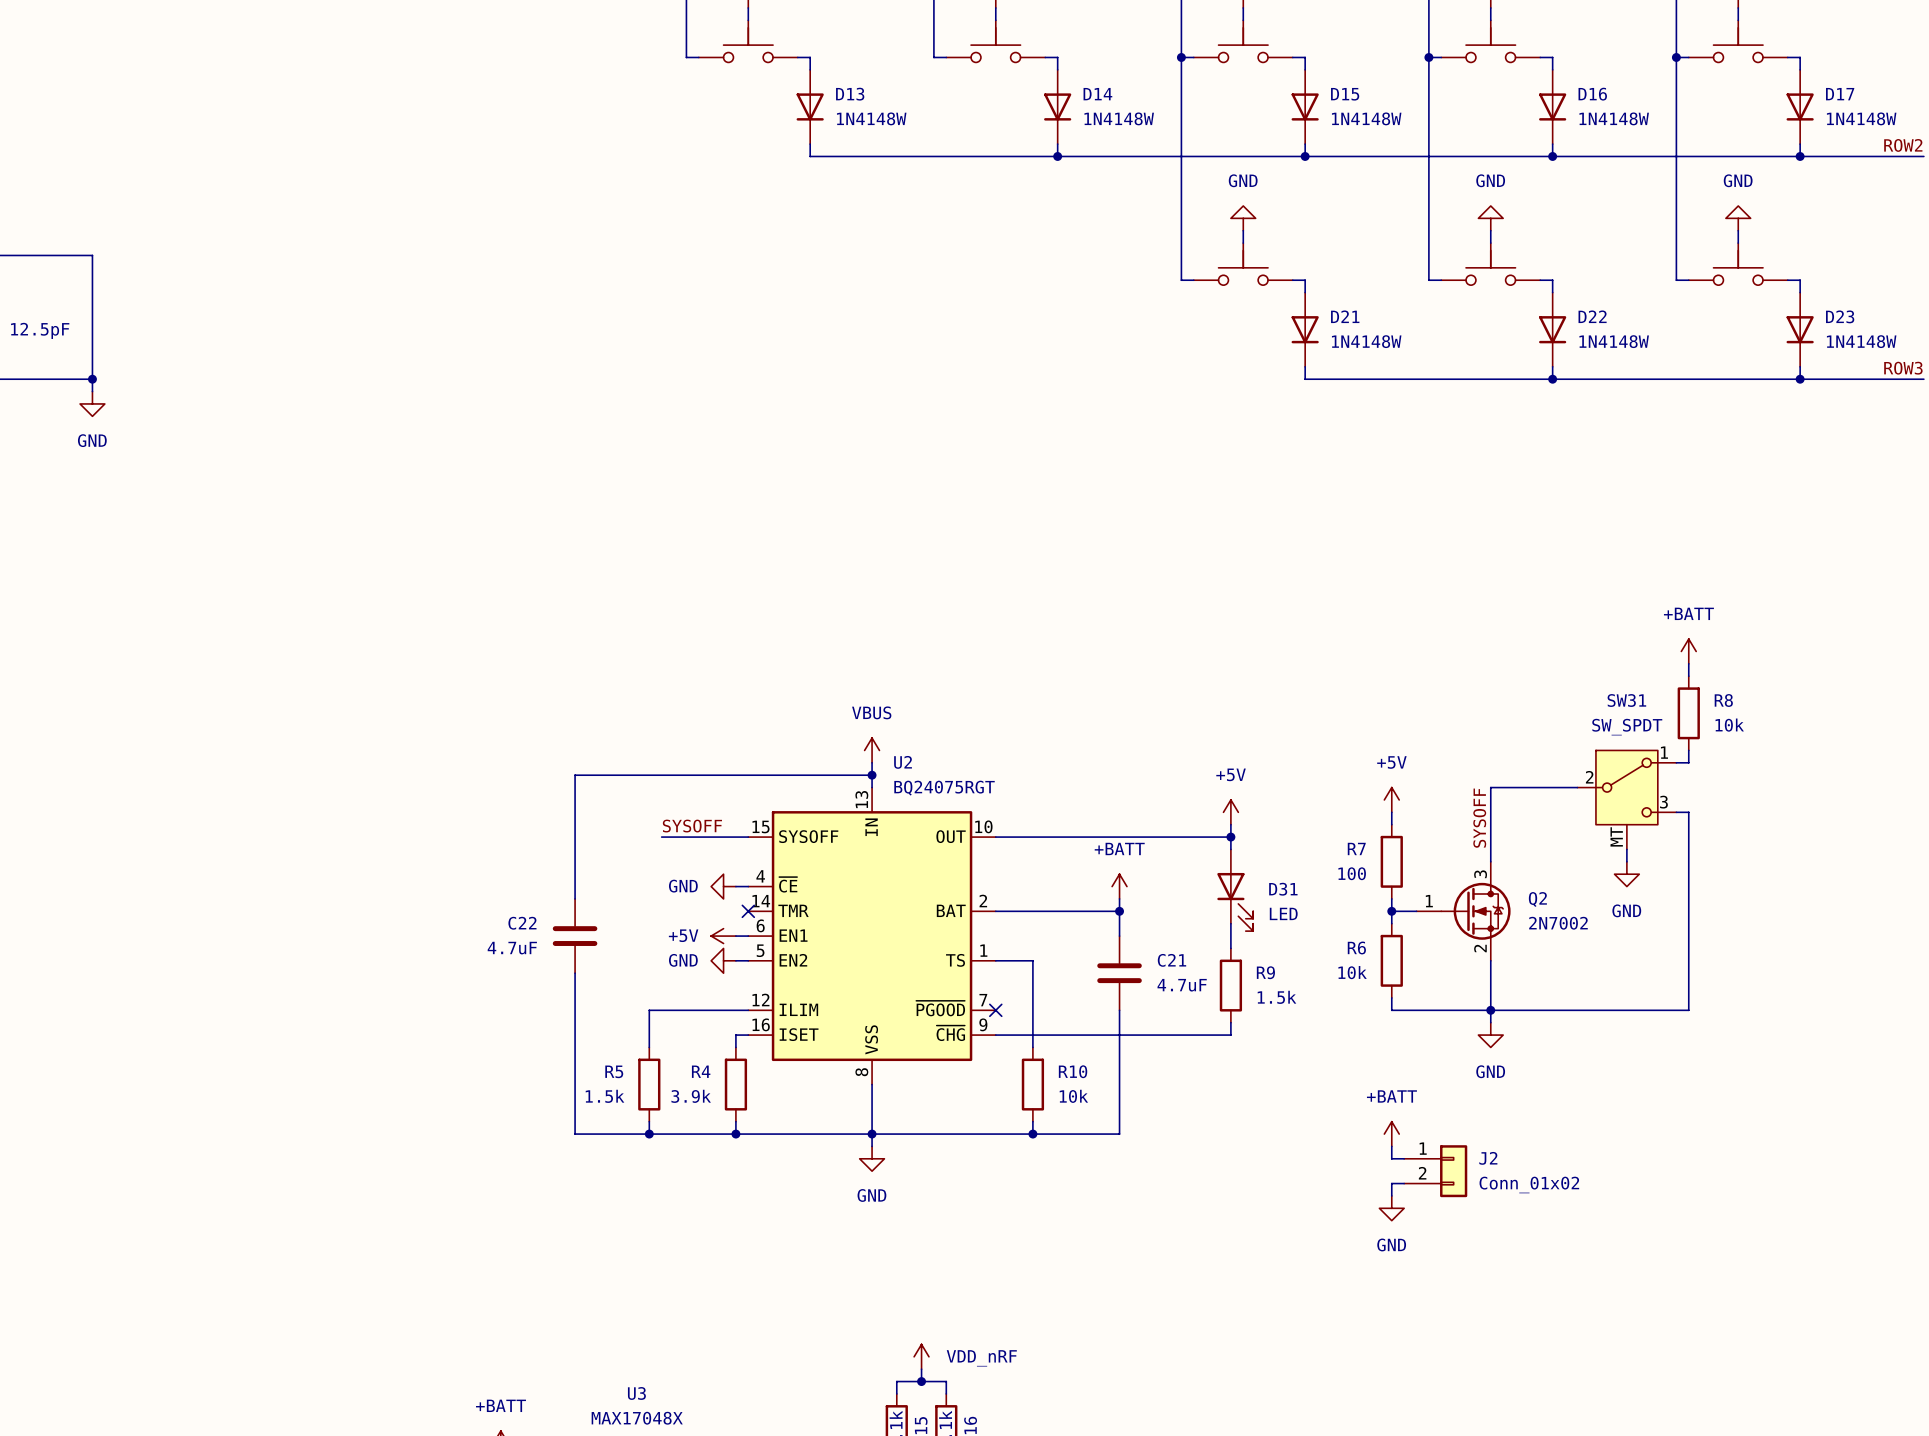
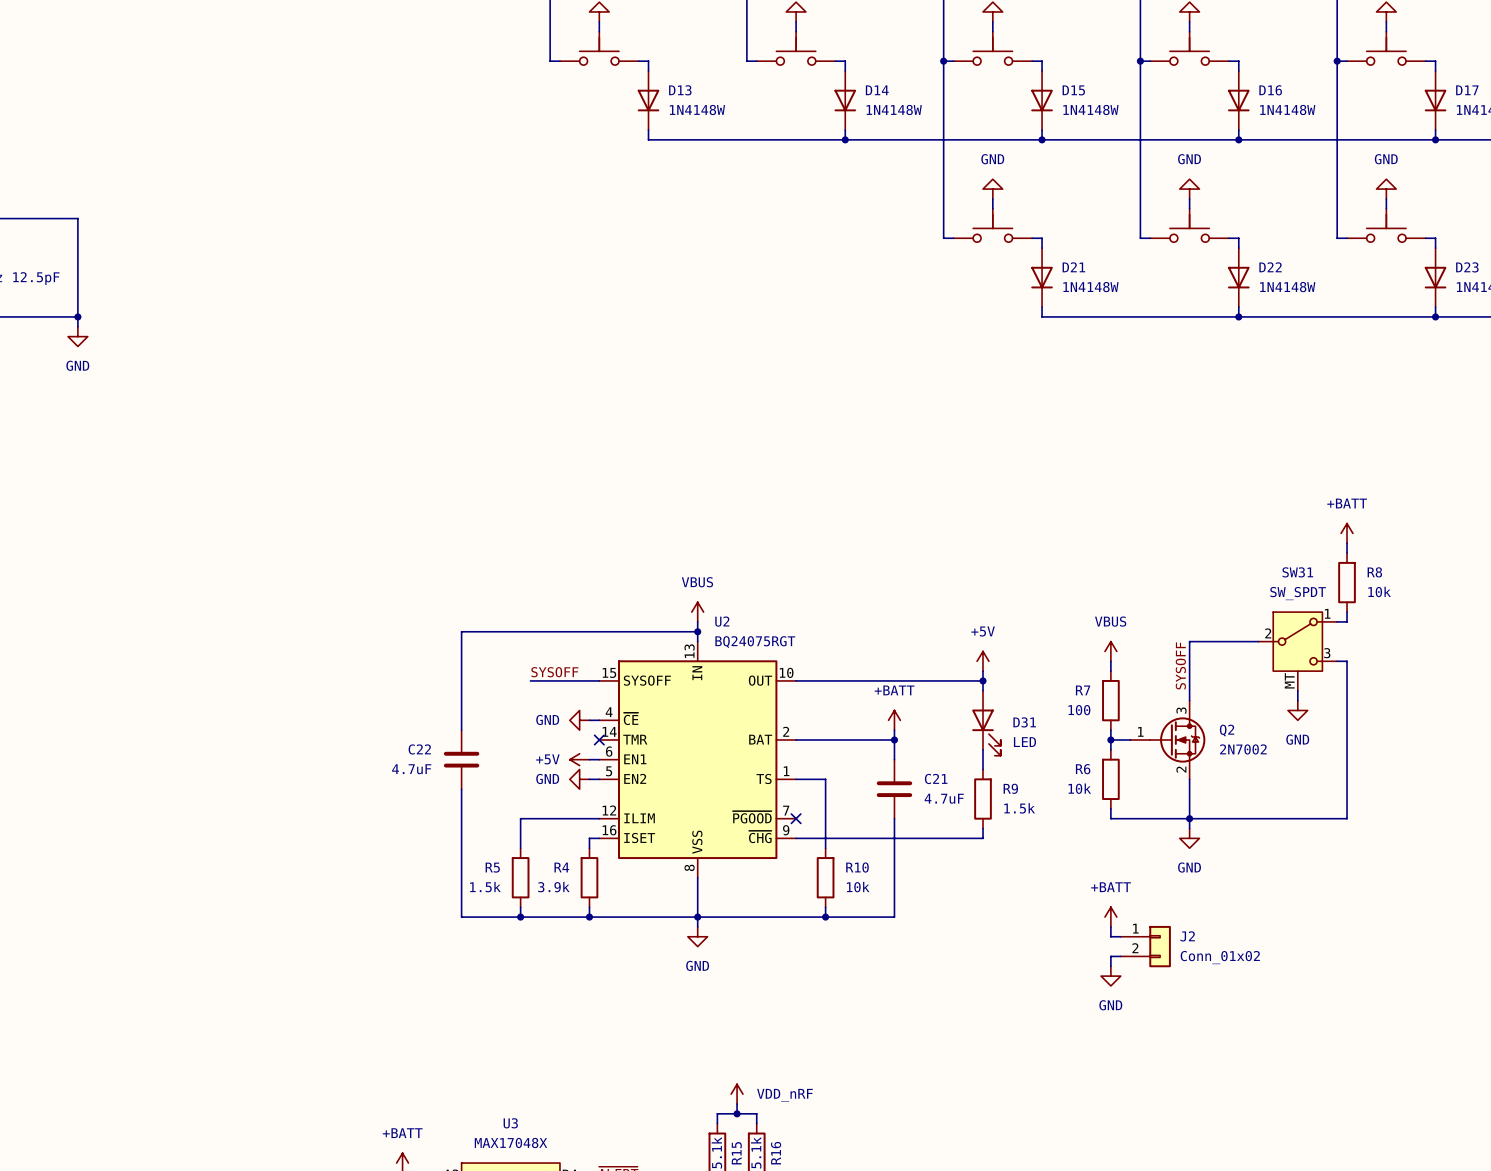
power symbol: +5V (1391, 799) -> VBUS (1110, 651)

